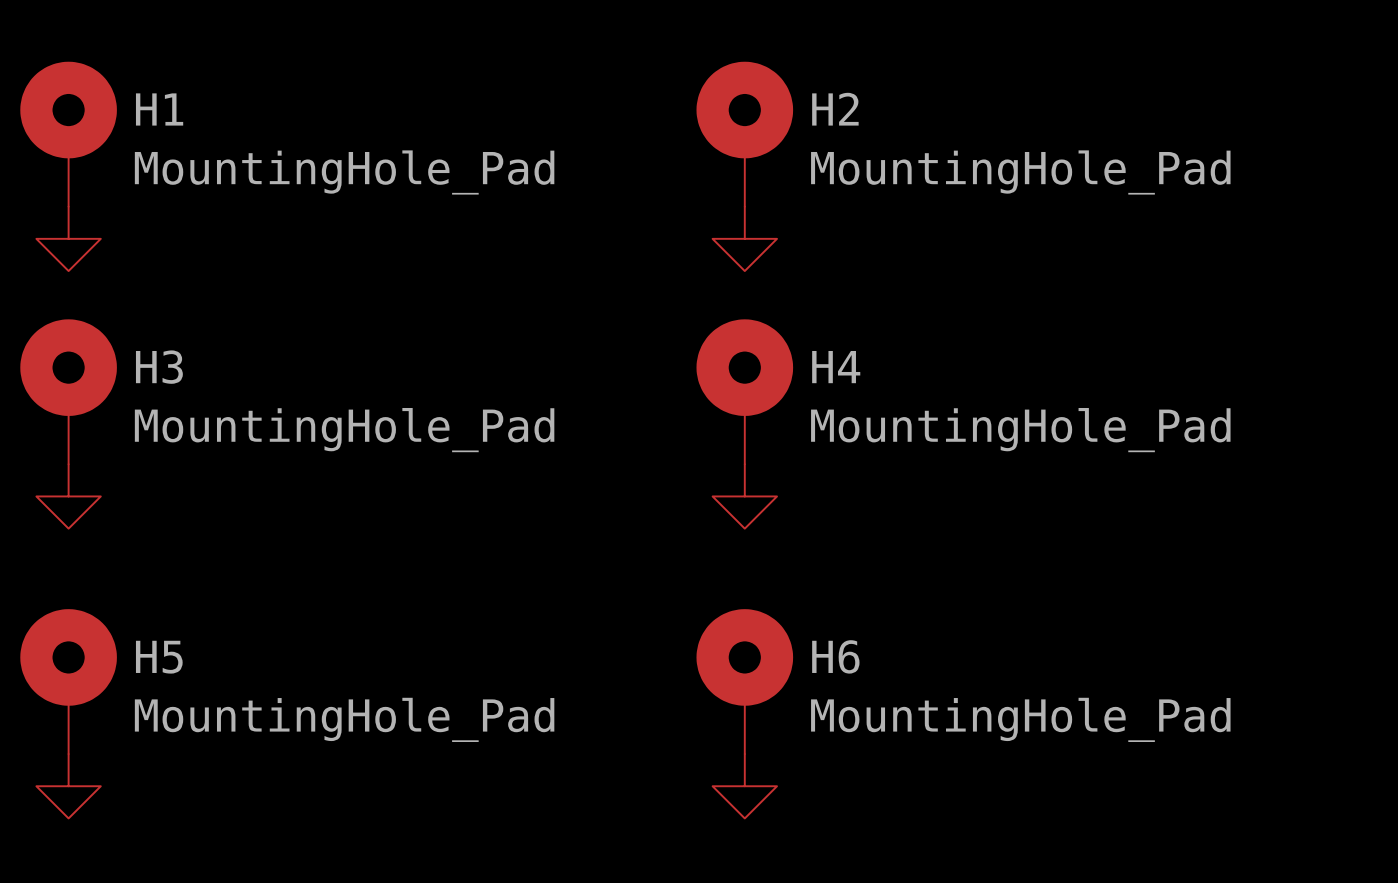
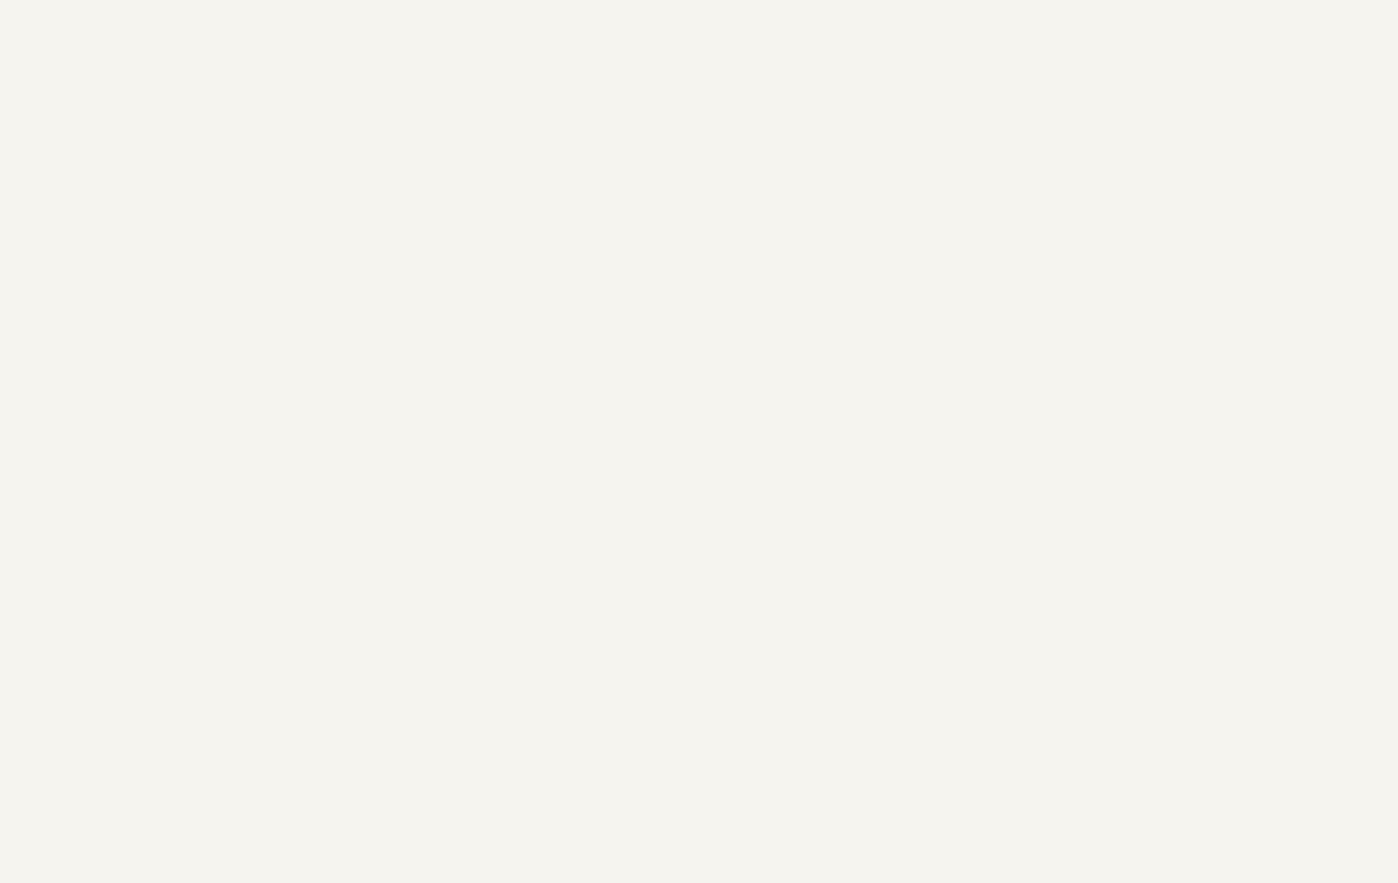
H1: MountingHole_Pad (68, 134) -> none
H2: MountingHole_Pad (744, 134) -> none
power symbol: (68, 238) -> none
power symbol: (744, 238) -> none
H3: MountingHole_Pad (68, 391) -> none
H4: MountingHole_Pad (744, 391) -> none
power symbol: (68, 496) -> none
power symbol: (744, 496) -> none
H5: MountingHole_Pad (68, 681) -> none
H6: MountingHole_Pad (744, 681) -> none
power symbol: (68, 786) -> none
power symbol: (744, 786) -> none

